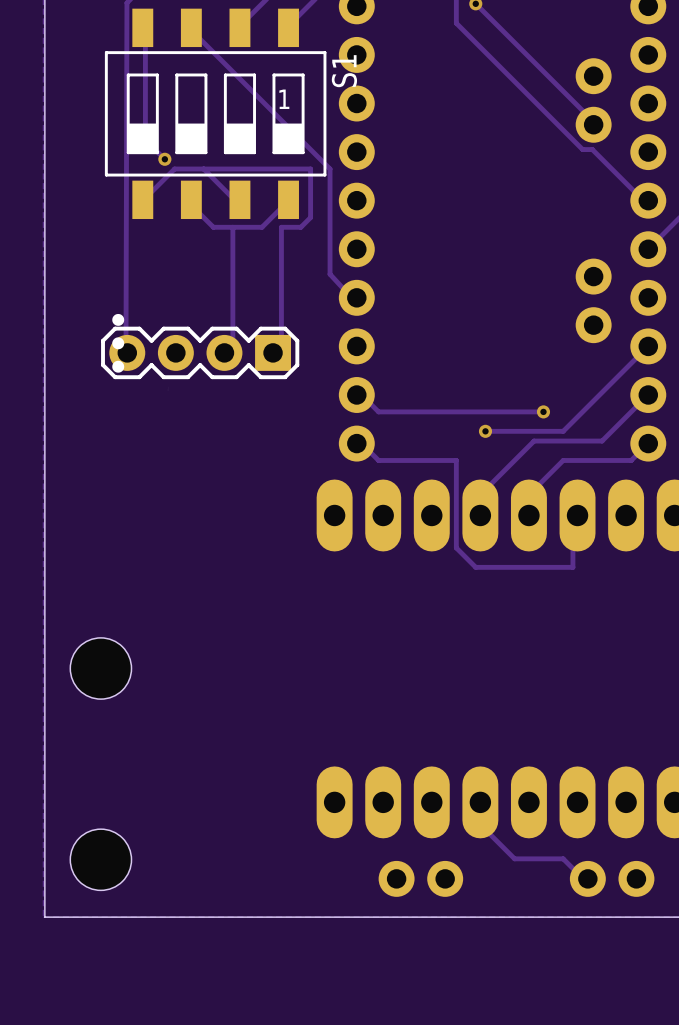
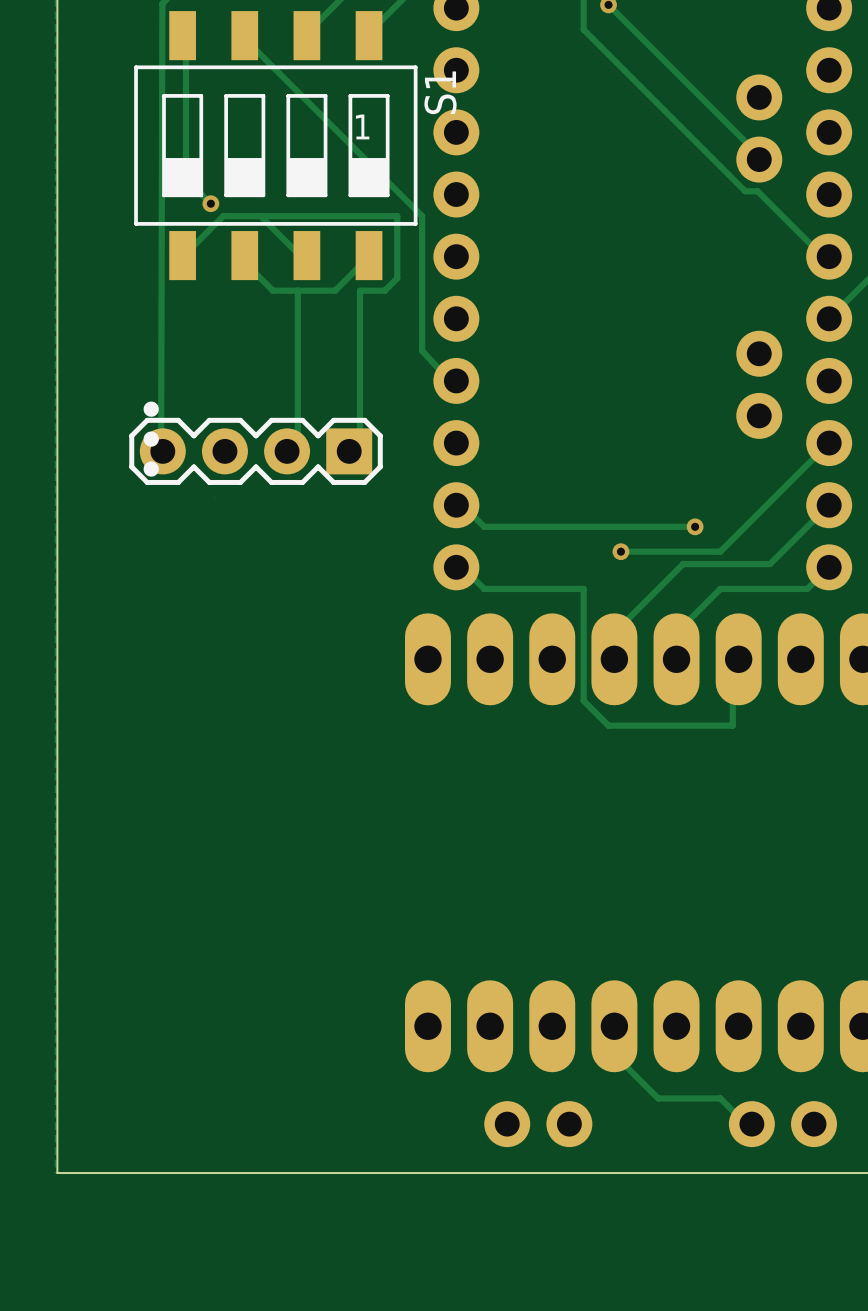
hole: (100, 668) -> none
hole: (100, 859) -> none

